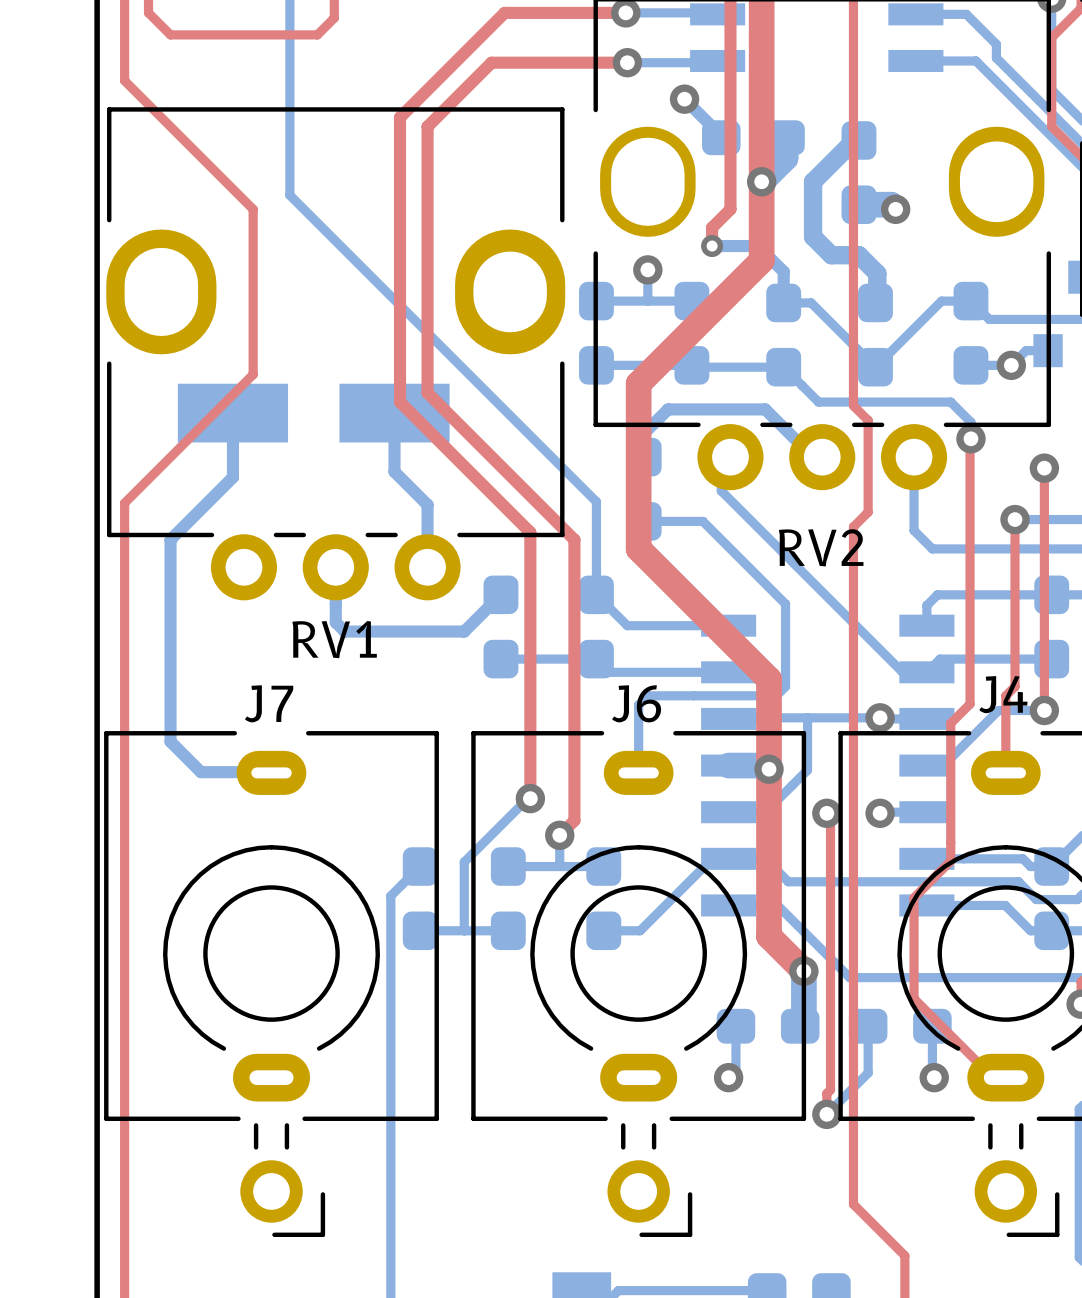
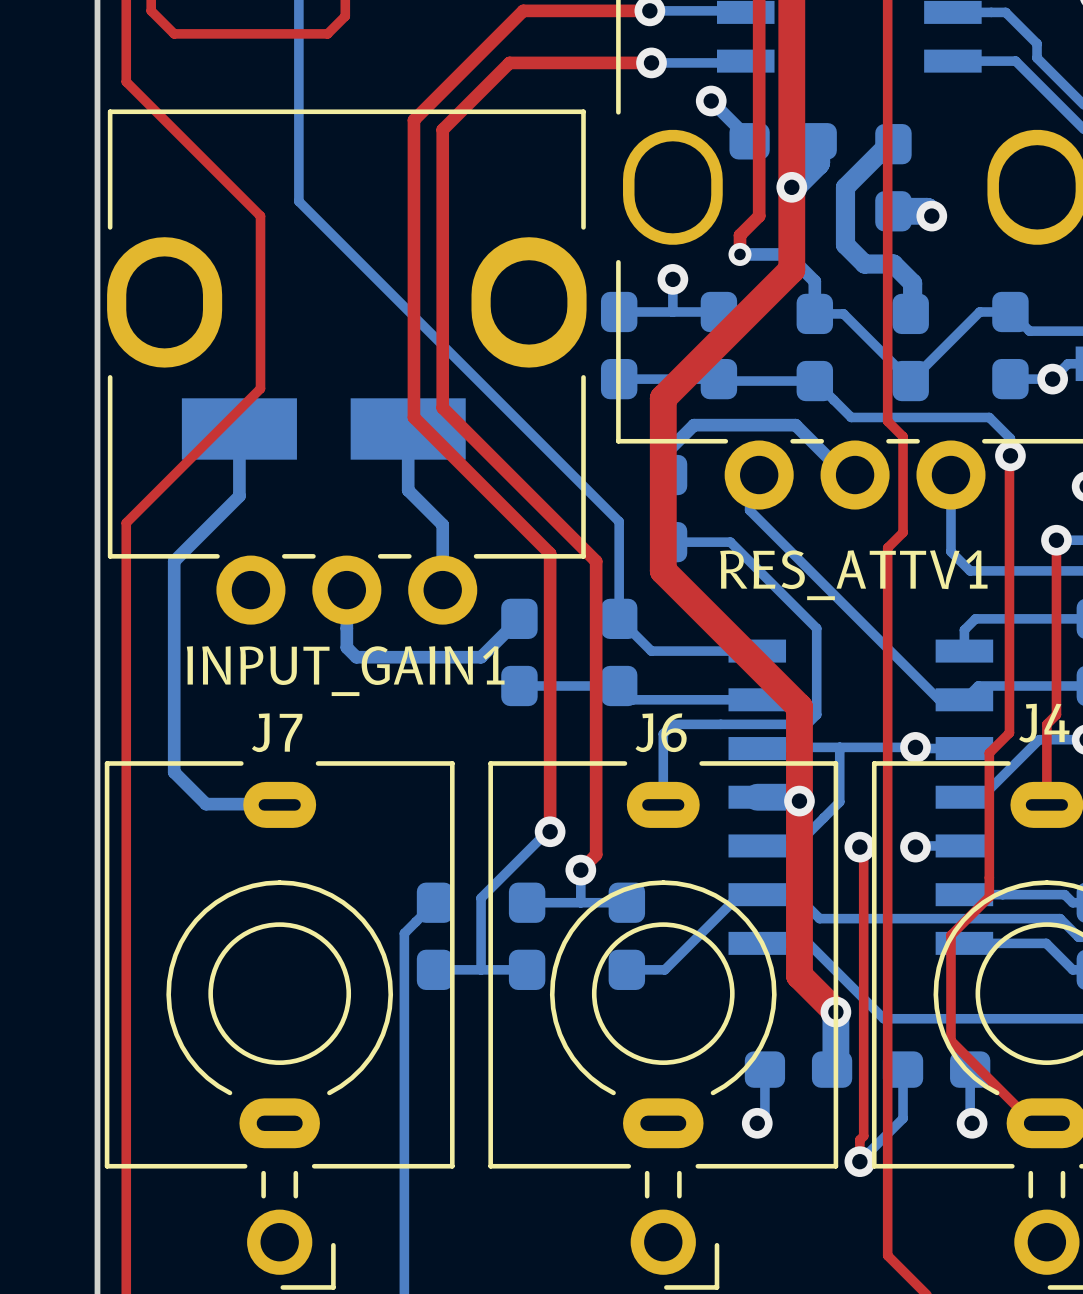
RV2 name: RV2 (821, 547) -> RES_ATTV1 (853, 575)
RV1 name: RV1 (334, 639) -> INPUT_GAIN1 (345, 671)

